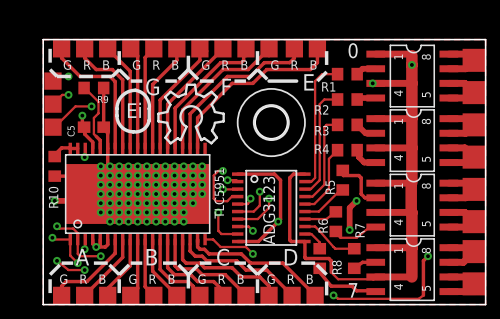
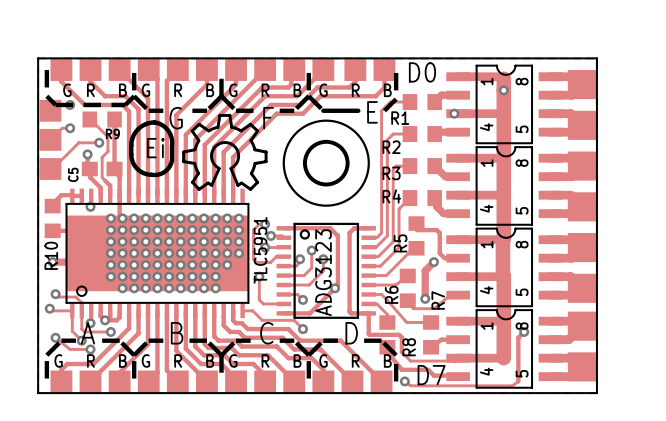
text: 0 (353, 50) -> D0 (422, 72)
text: none -> G (67, 90)
text: none -> R (90, 90)
text: none -> B (122, 90)
text: none -> G (145, 90)
text: none -> R (178, 90)
text: none -> B (210, 90)
text: none -> G (233, 90)
text: none -> R (265, 90)
text: none -> B (297, 90)
text: none -> G (323, 90)
text: none -> R (355, 90)
text: none -> B (387, 90)
text: G R B (86, 65) -> none
text: G R B (155, 65) -> none
text: G R B (224, 65) -> none
text: G R B (293, 65) -> none
text: G R B (82, 279) -> G (58, 360)
text: none -> R (90, 360)
text: none -> B (122, 360)
text: G R B (151, 279) -> G (145, 360)
text: none -> R (178, 360)
text: none -> B (210, 360)
text: G R B (220, 279) -> G (233, 360)
text: none -> R (265, 360)
text: none -> B (297, 360)
text: G R B (290, 279) -> G (323, 360)
text: none -> R (355, 360)
text: none -> B (387, 360)
text: 7 (353, 290) -> D7 (431, 375)

